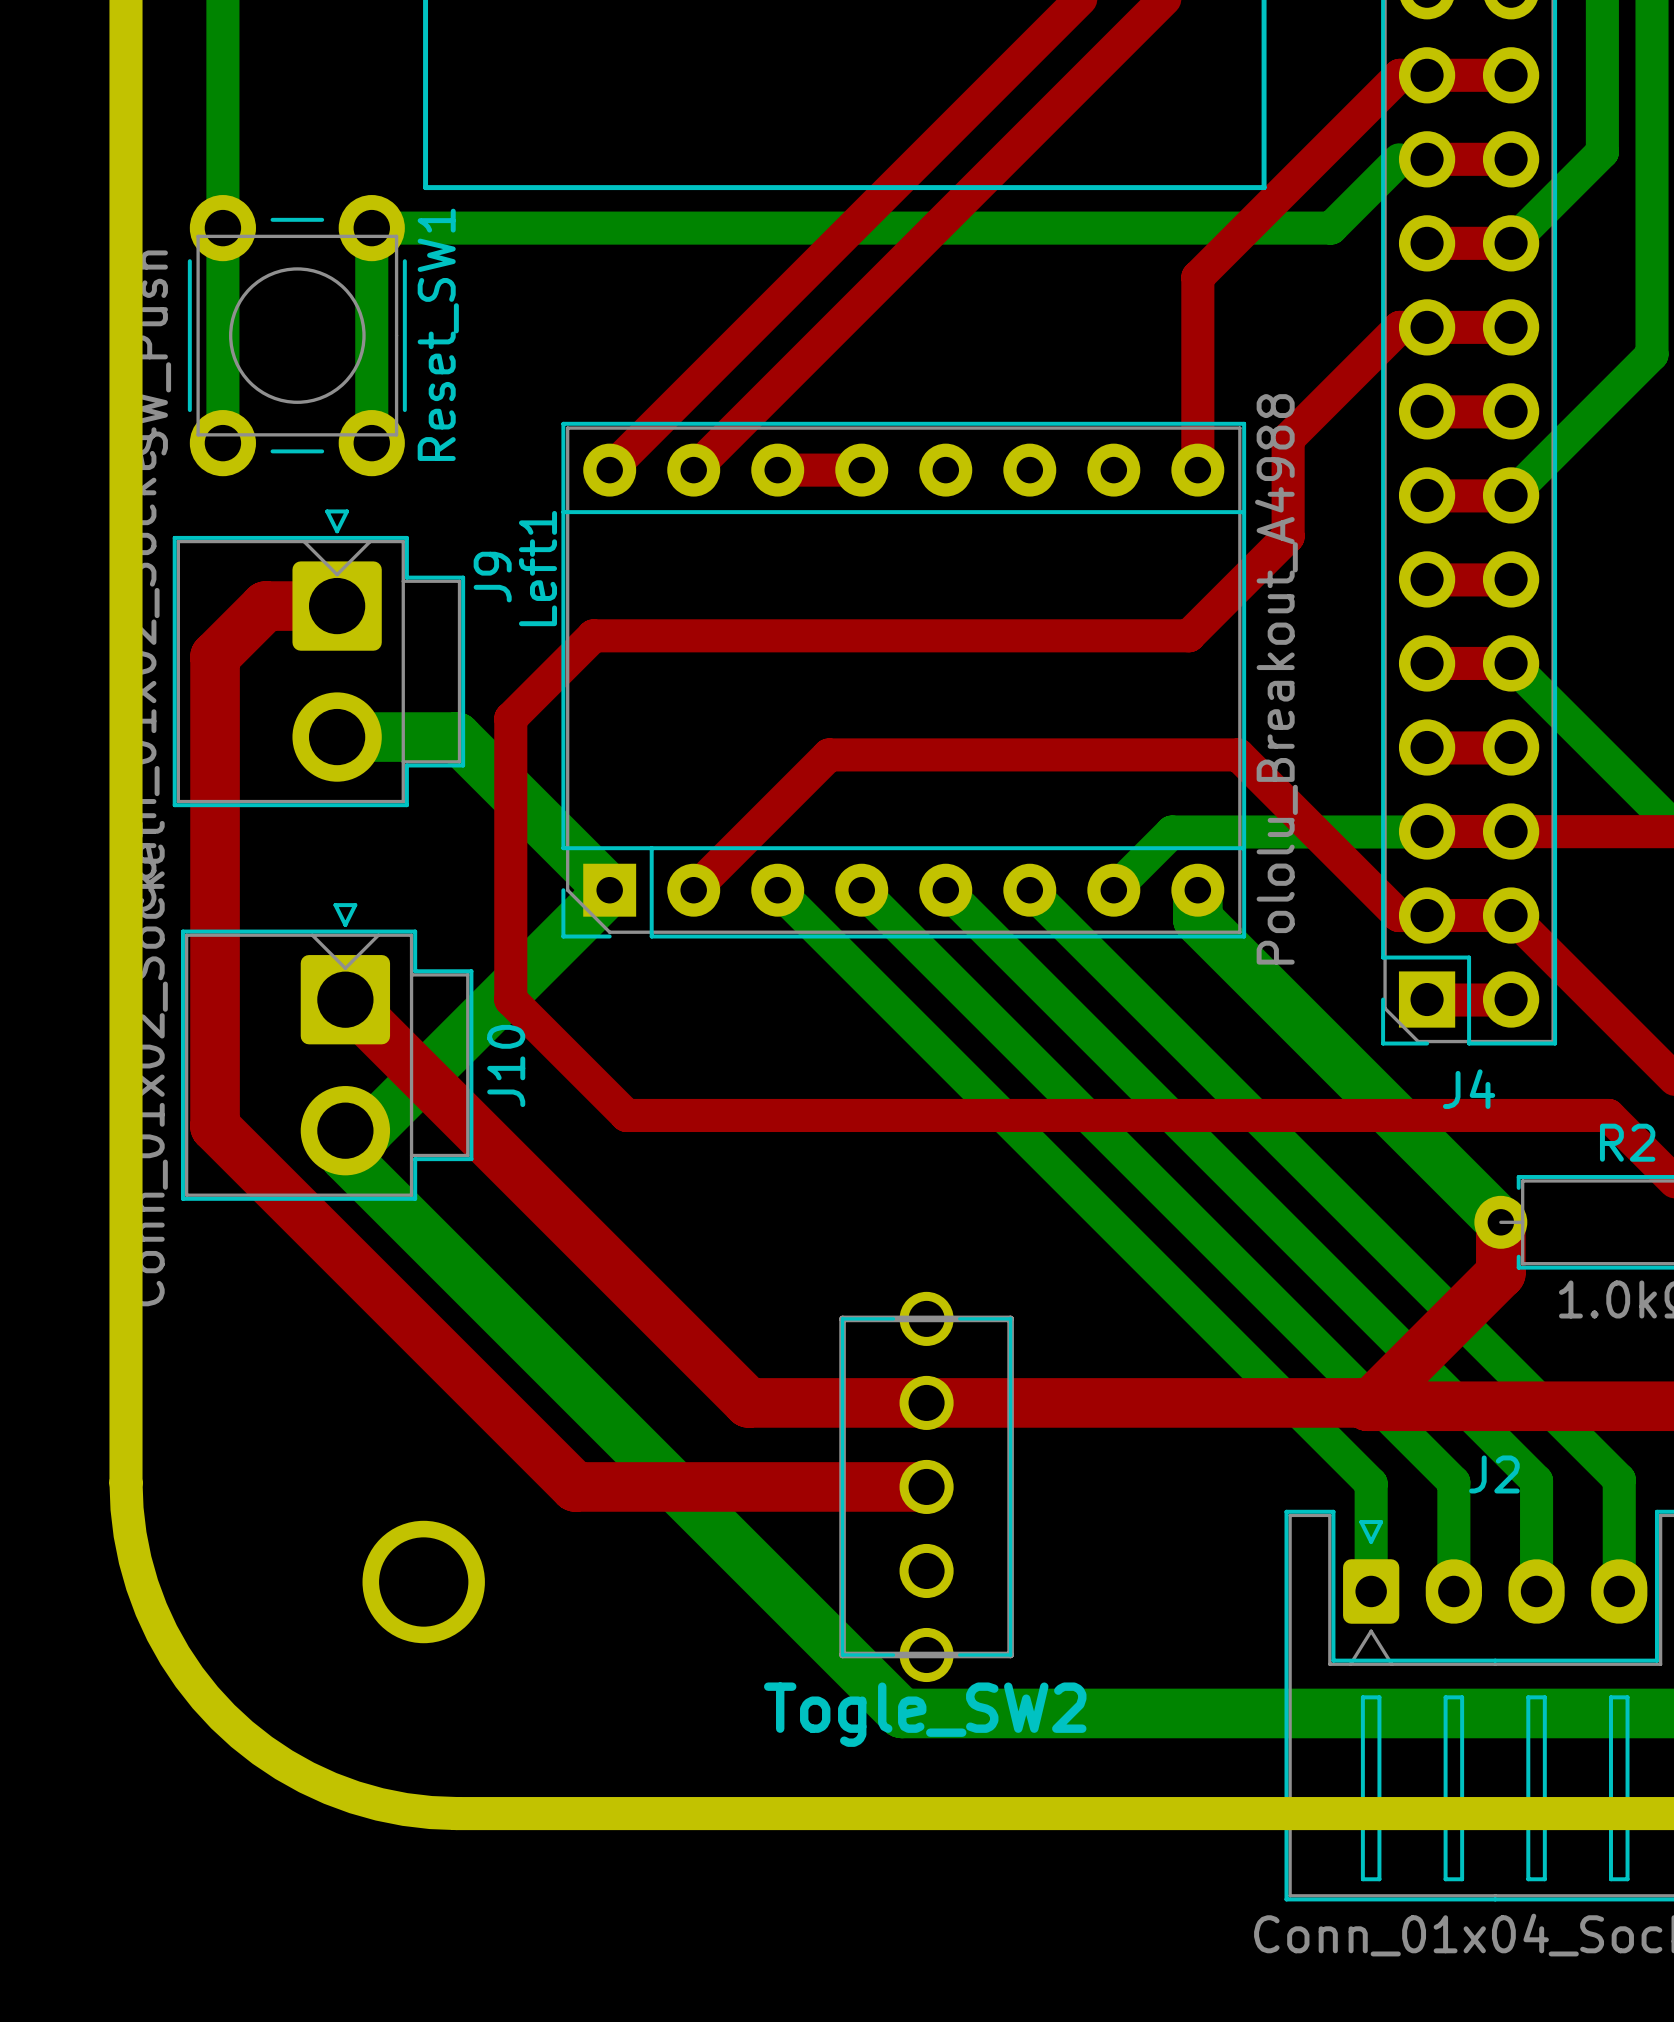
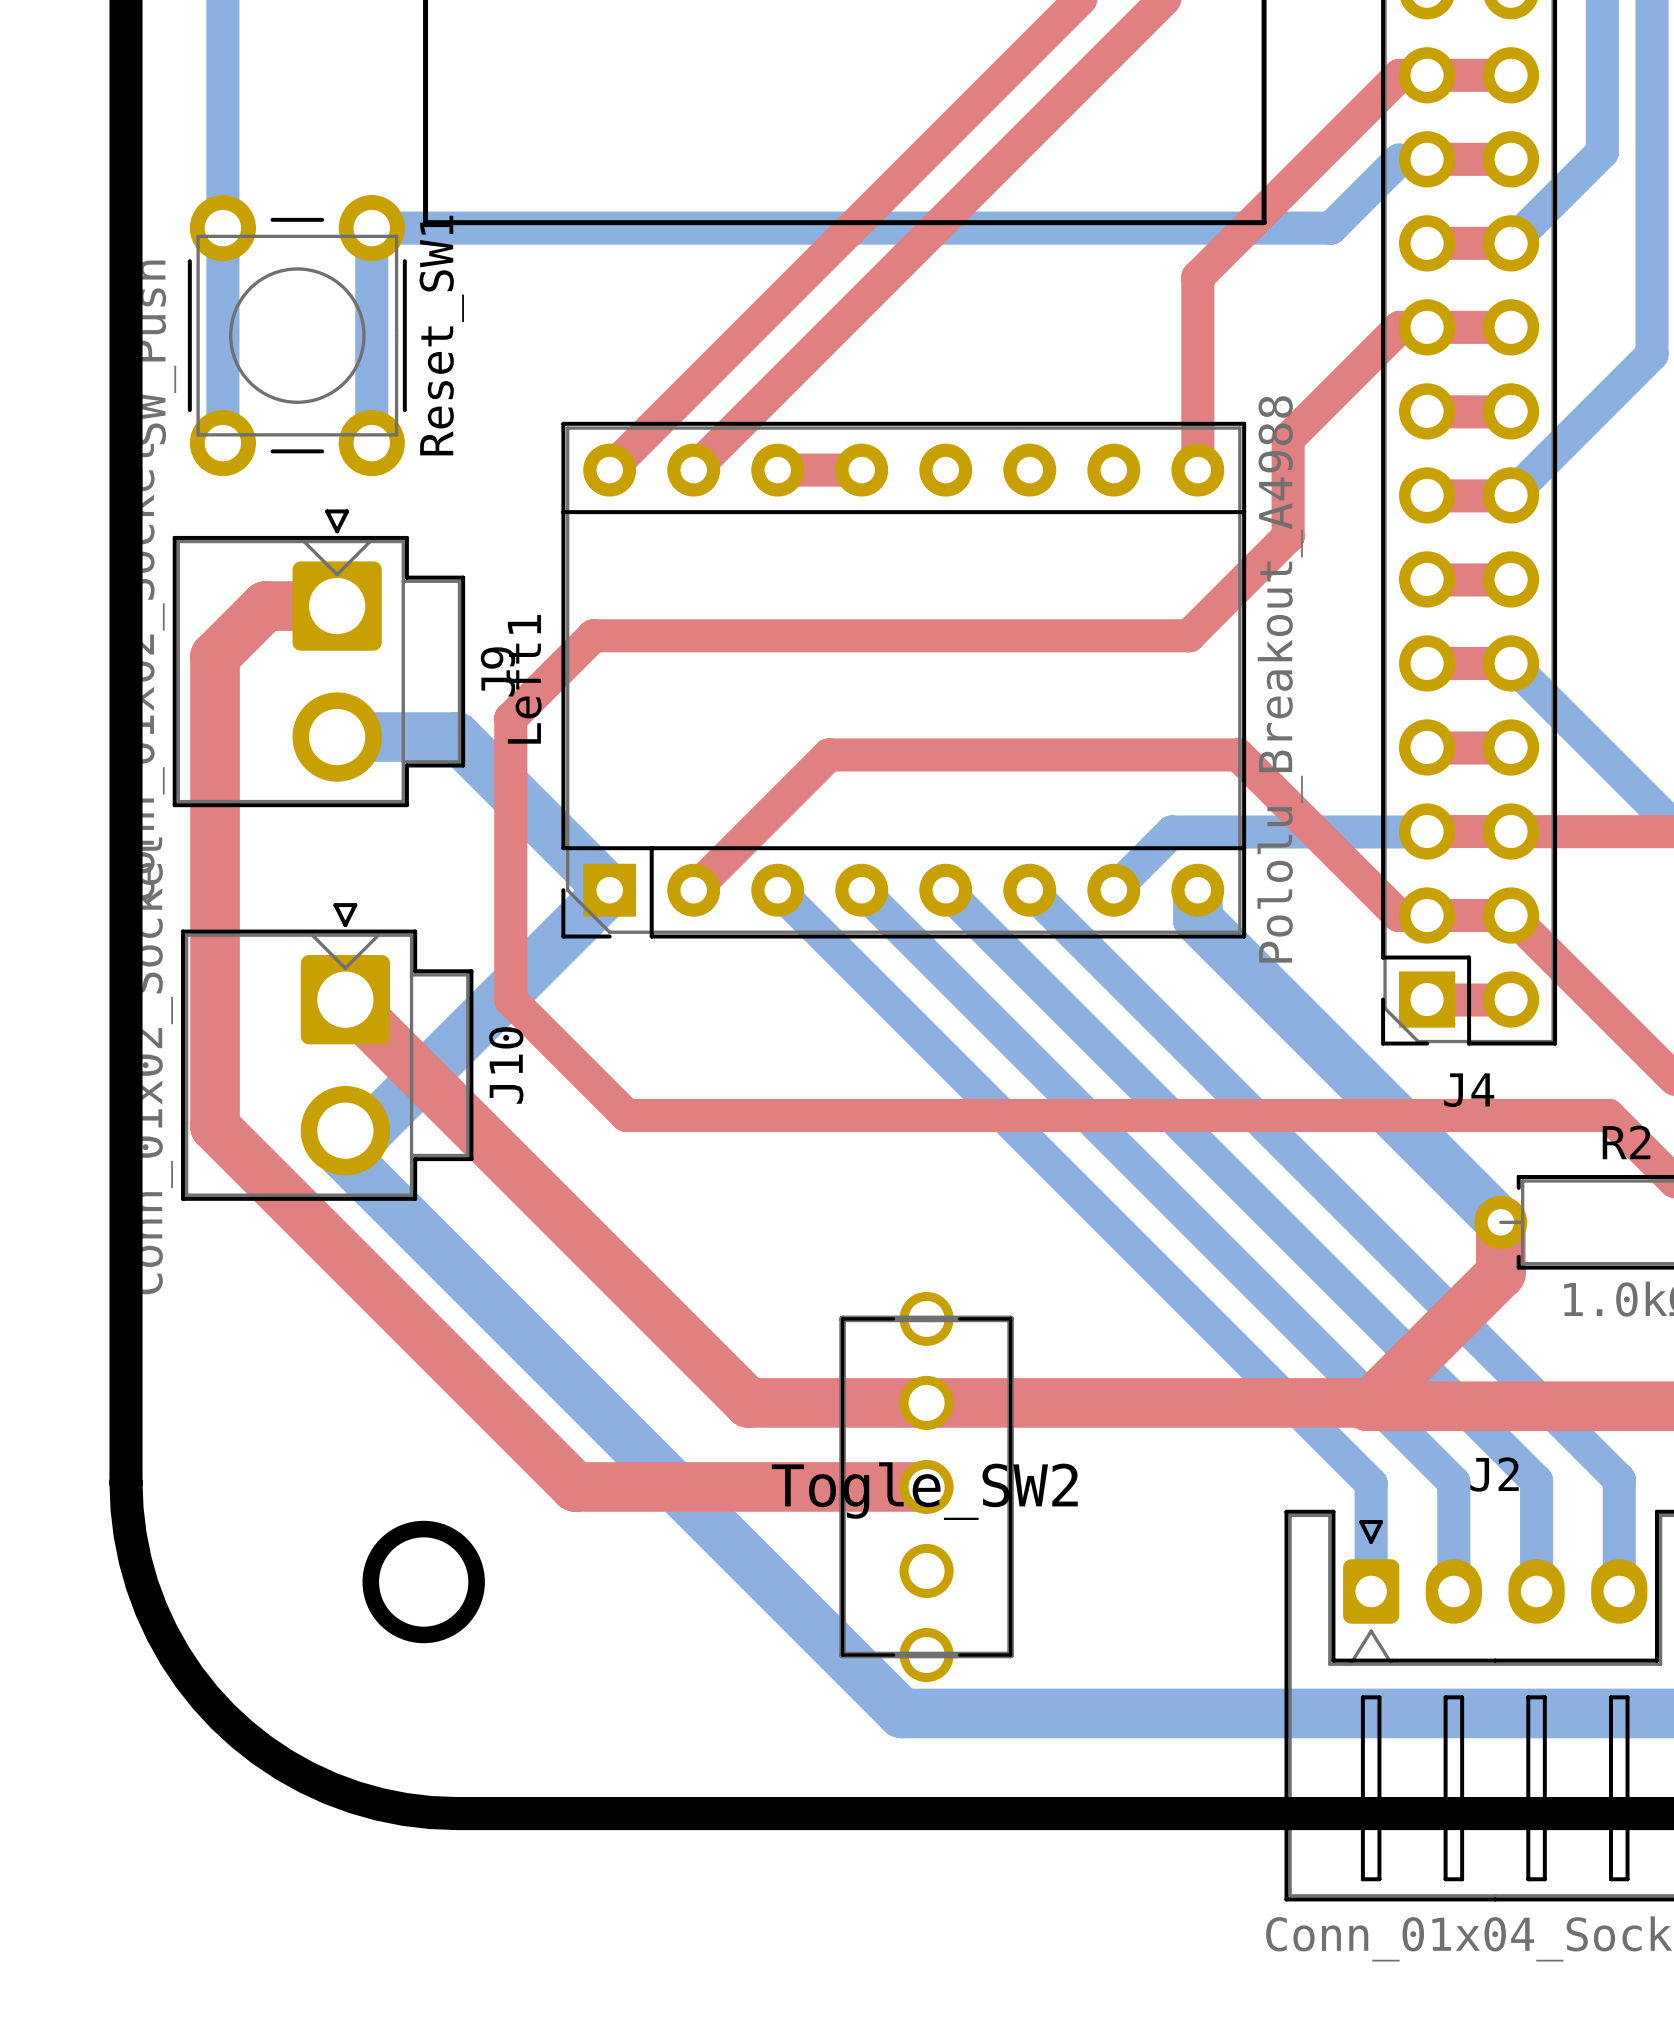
line: (425, 187) (1264, 187) -> (425, 187) (425, 222) (1264, 222) (1264, 187)
Left1 name position: Left1 (537, 568) -> Left1 (524, 679)
J9 name position: J9 (492, 577) -> J9 (497, 671)
Togle_SW2 name position: Togle_SW2 (925, 1714) -> Togle_SW2 (924, 1491)

